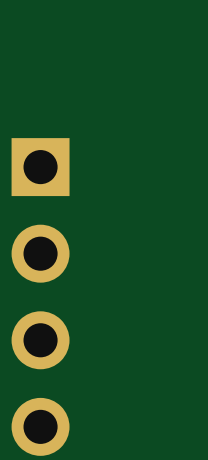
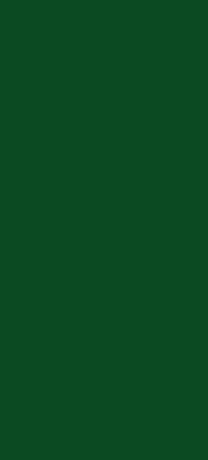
part: (40, 296) -> none

